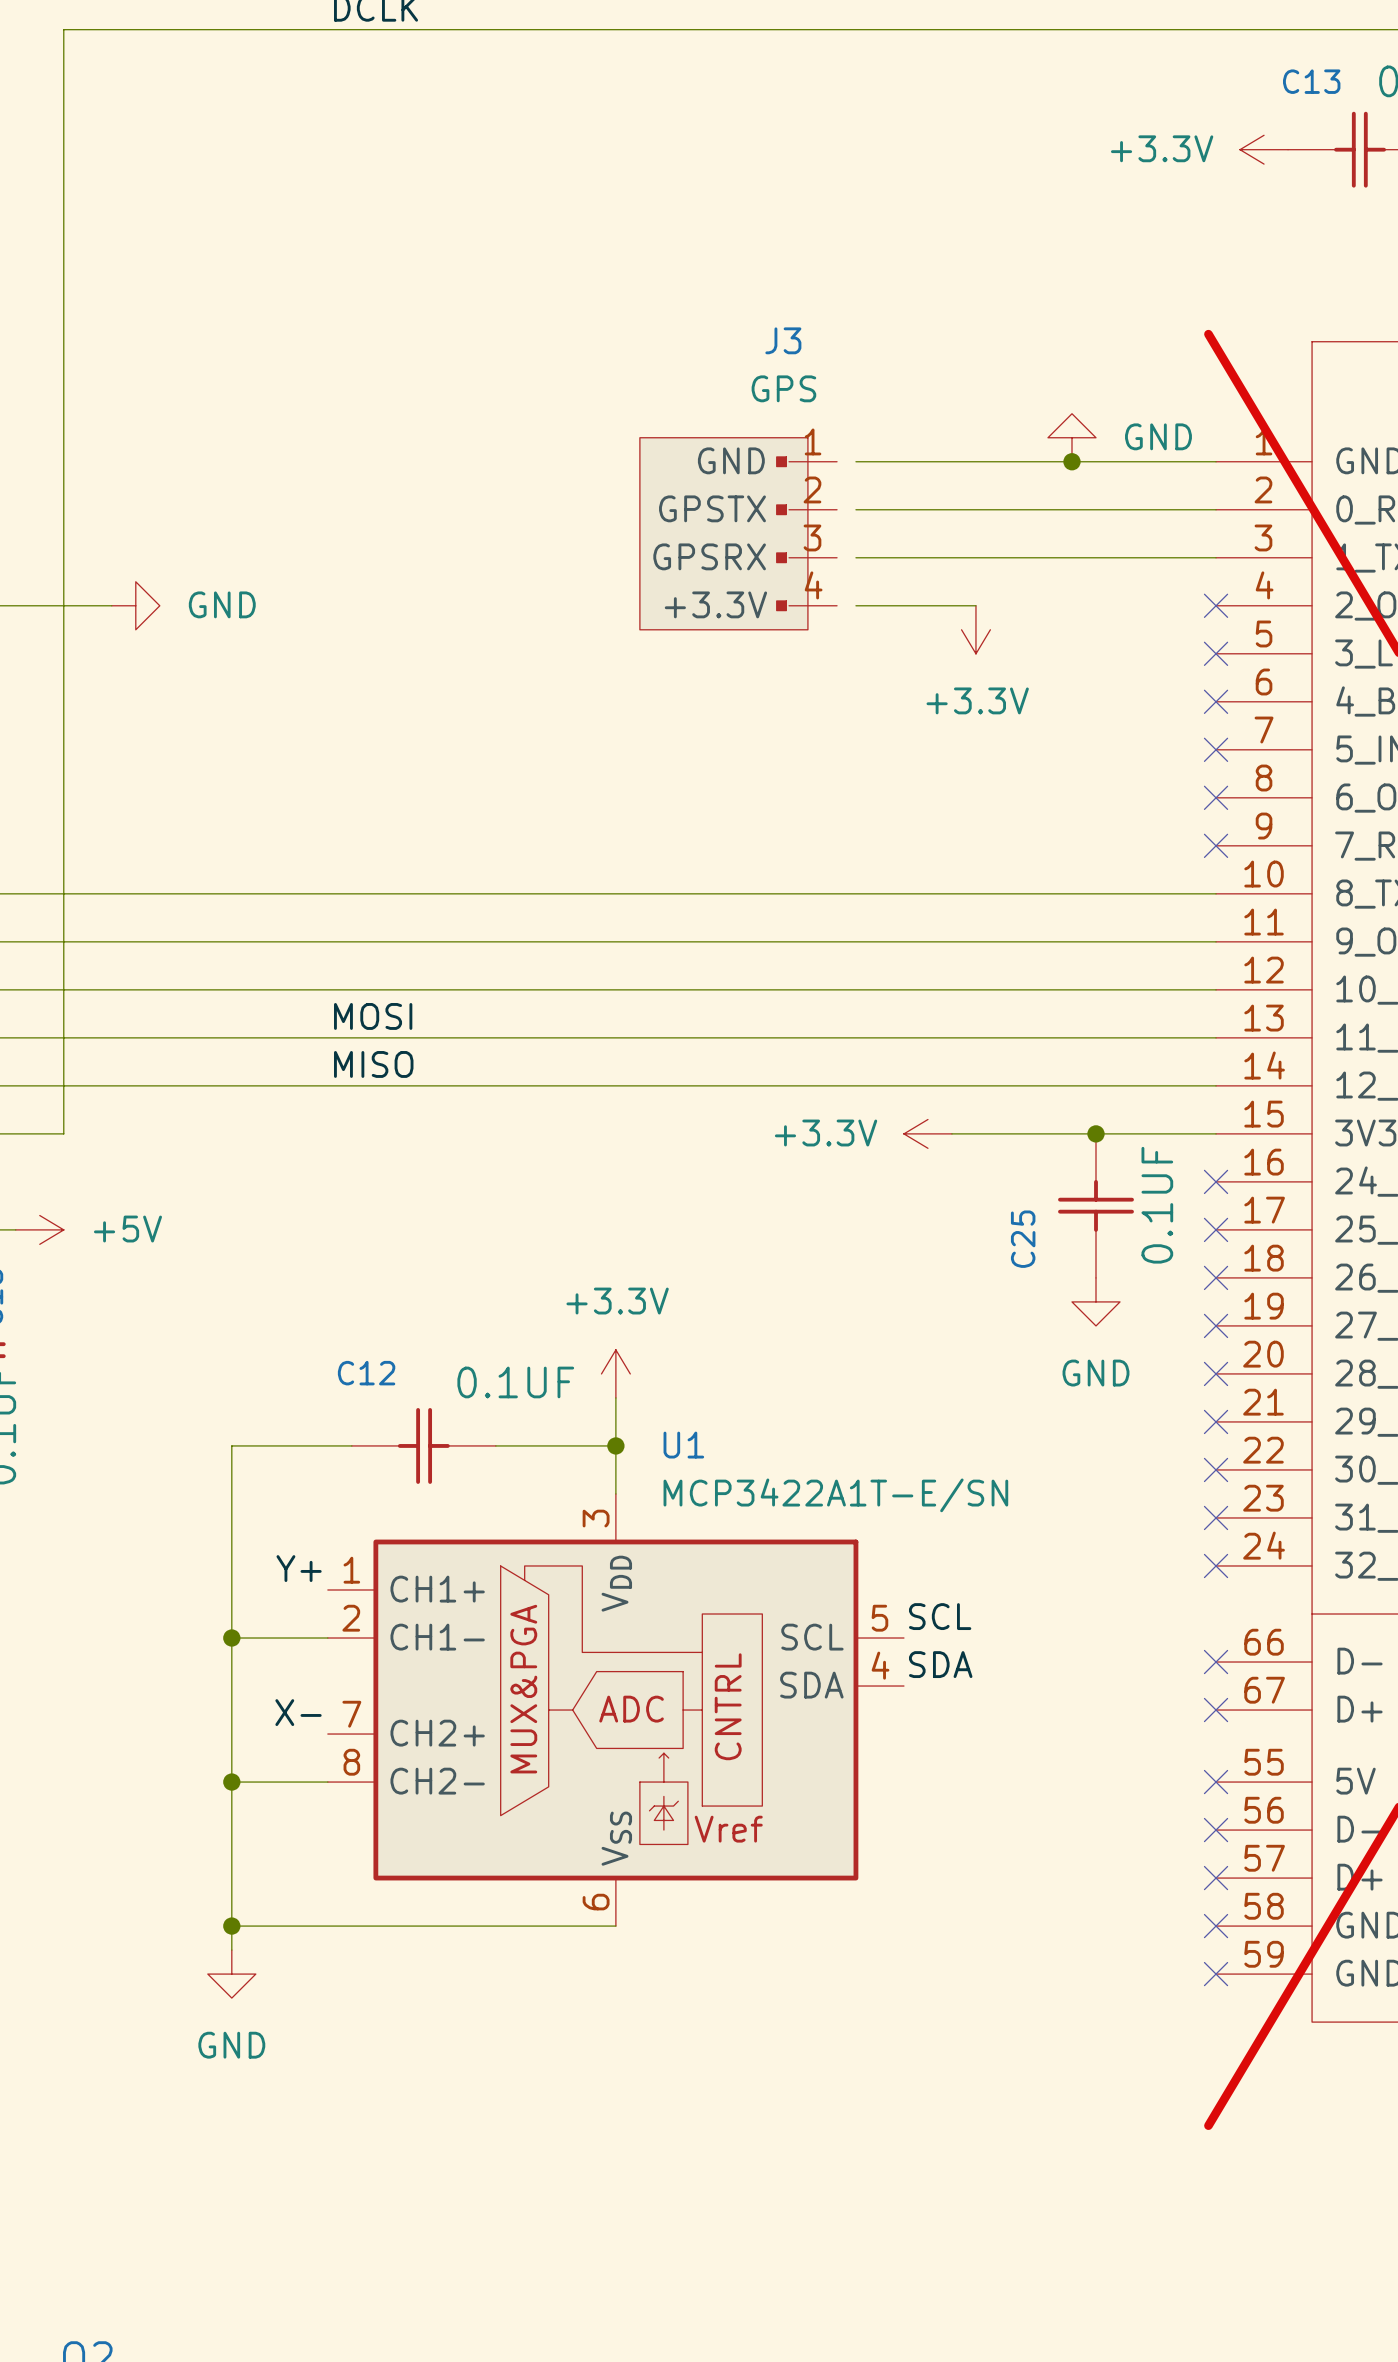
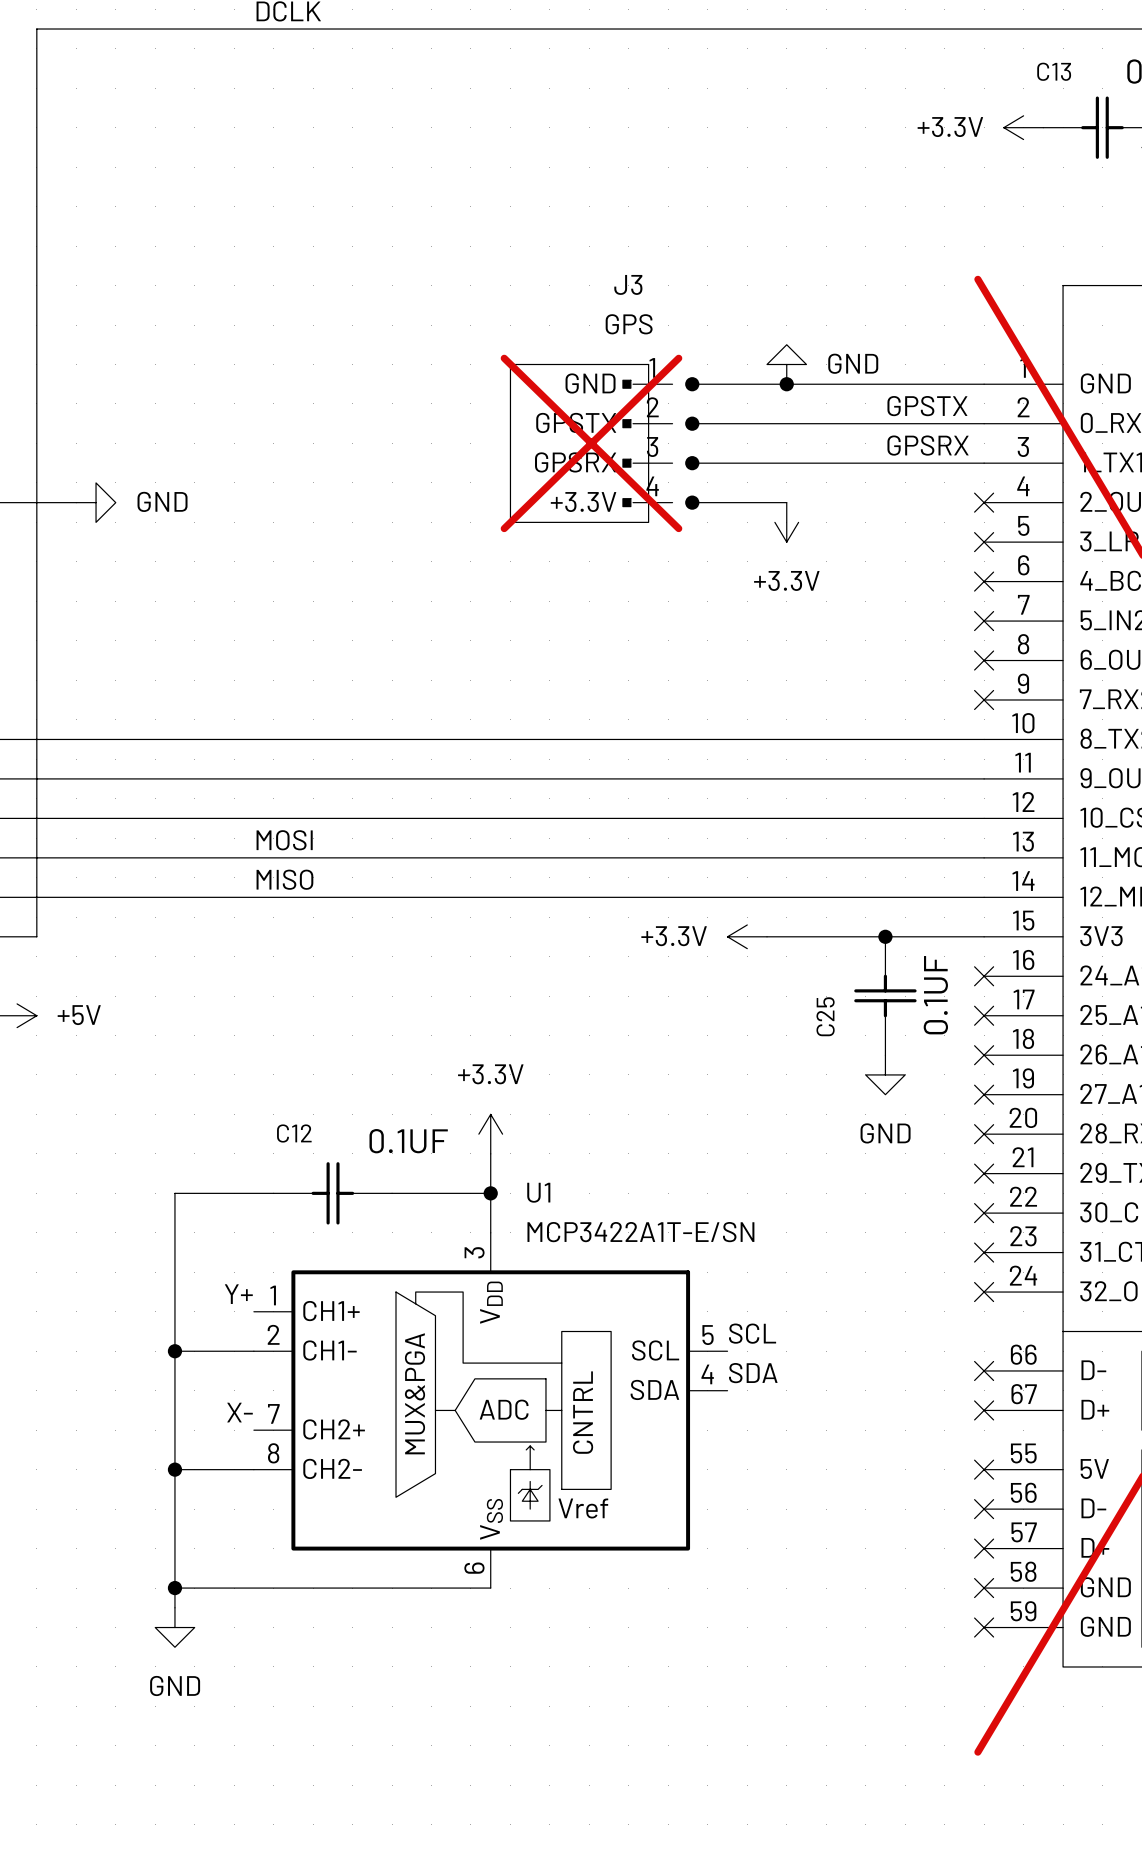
power symbol position: GND (1071, 437) -> GND (786, 364)
junction: none -> (692, 384)
junction position: (1071, 461) -> (786, 384)
label: none -> GPSTX (927, 406)
junction: none -> (692, 423)
J3 do-not-place cross: none -> (591, 443)
label: none -> GPSRX (928, 445)
junction: none -> (692, 463)
junction: none -> (692, 502)

